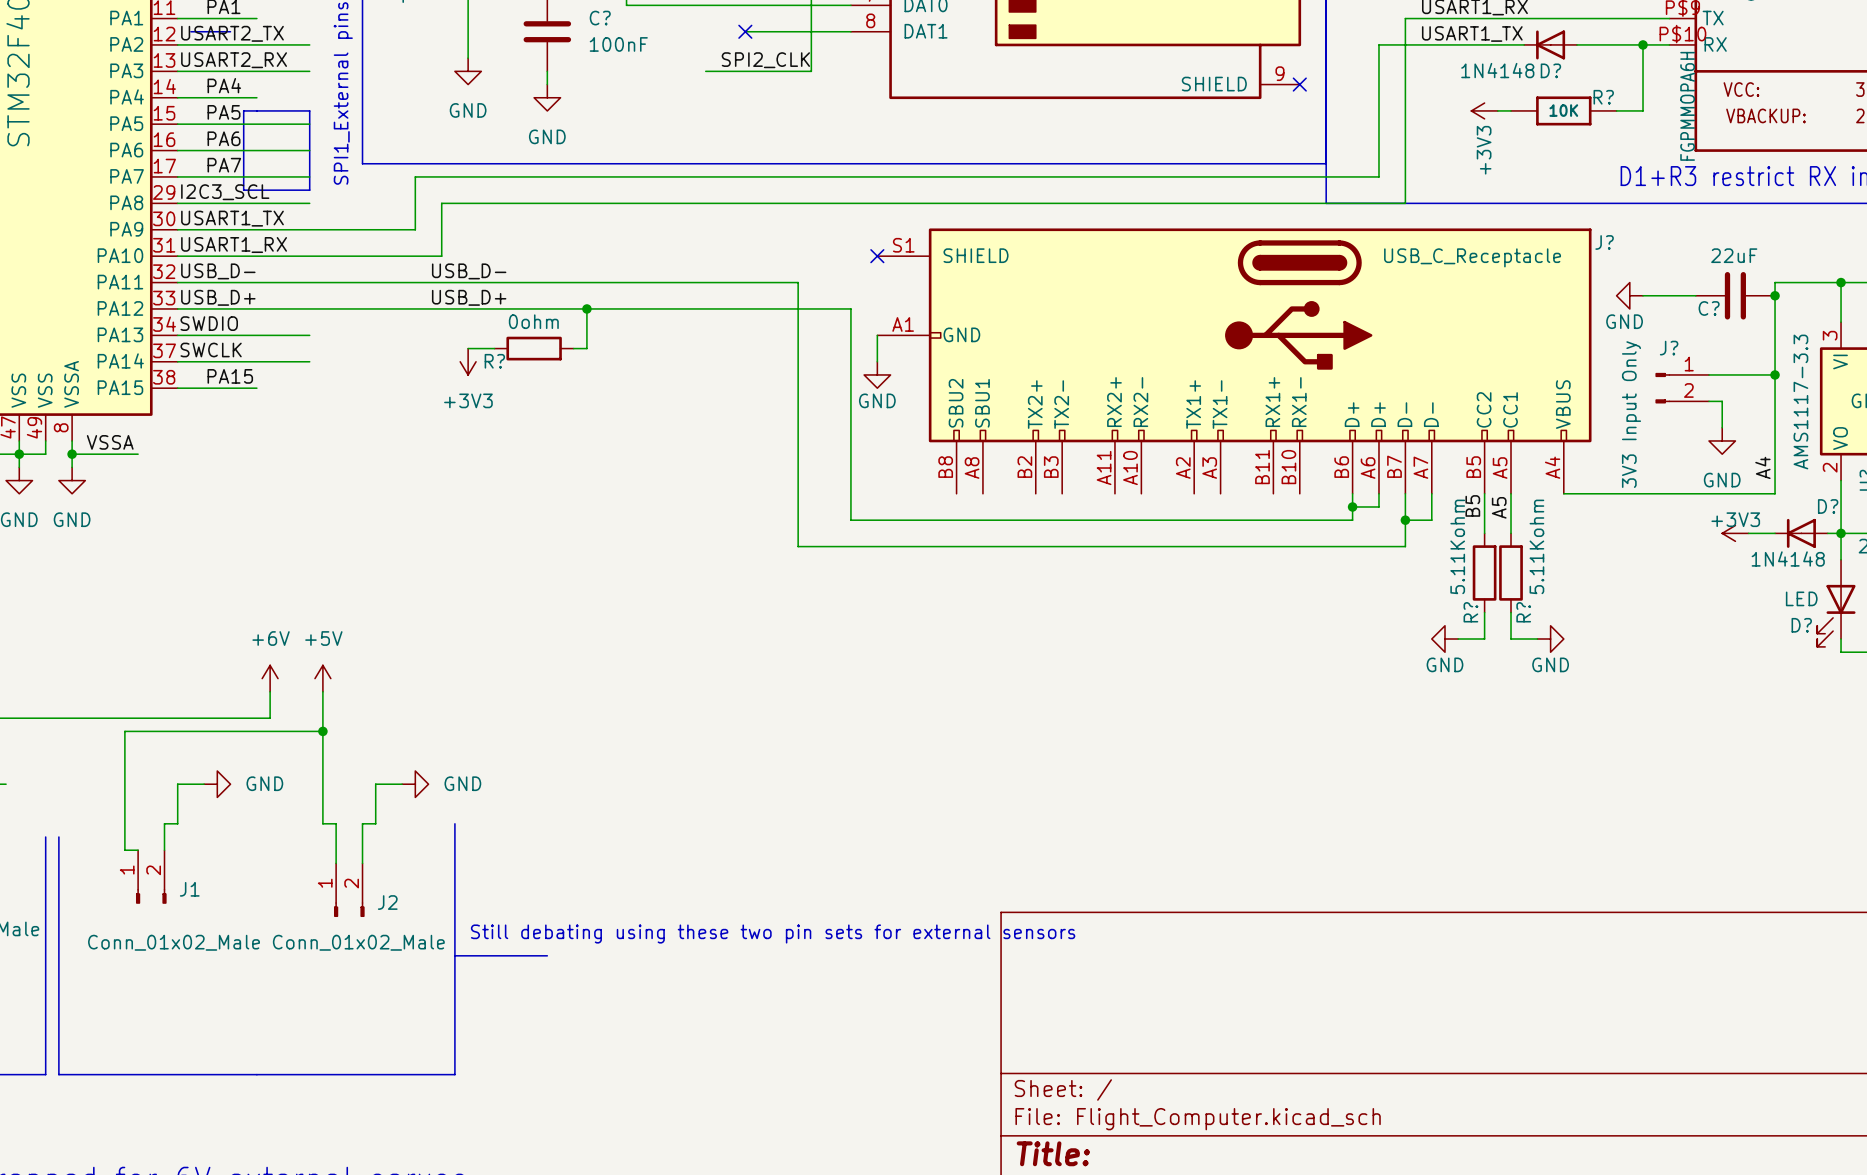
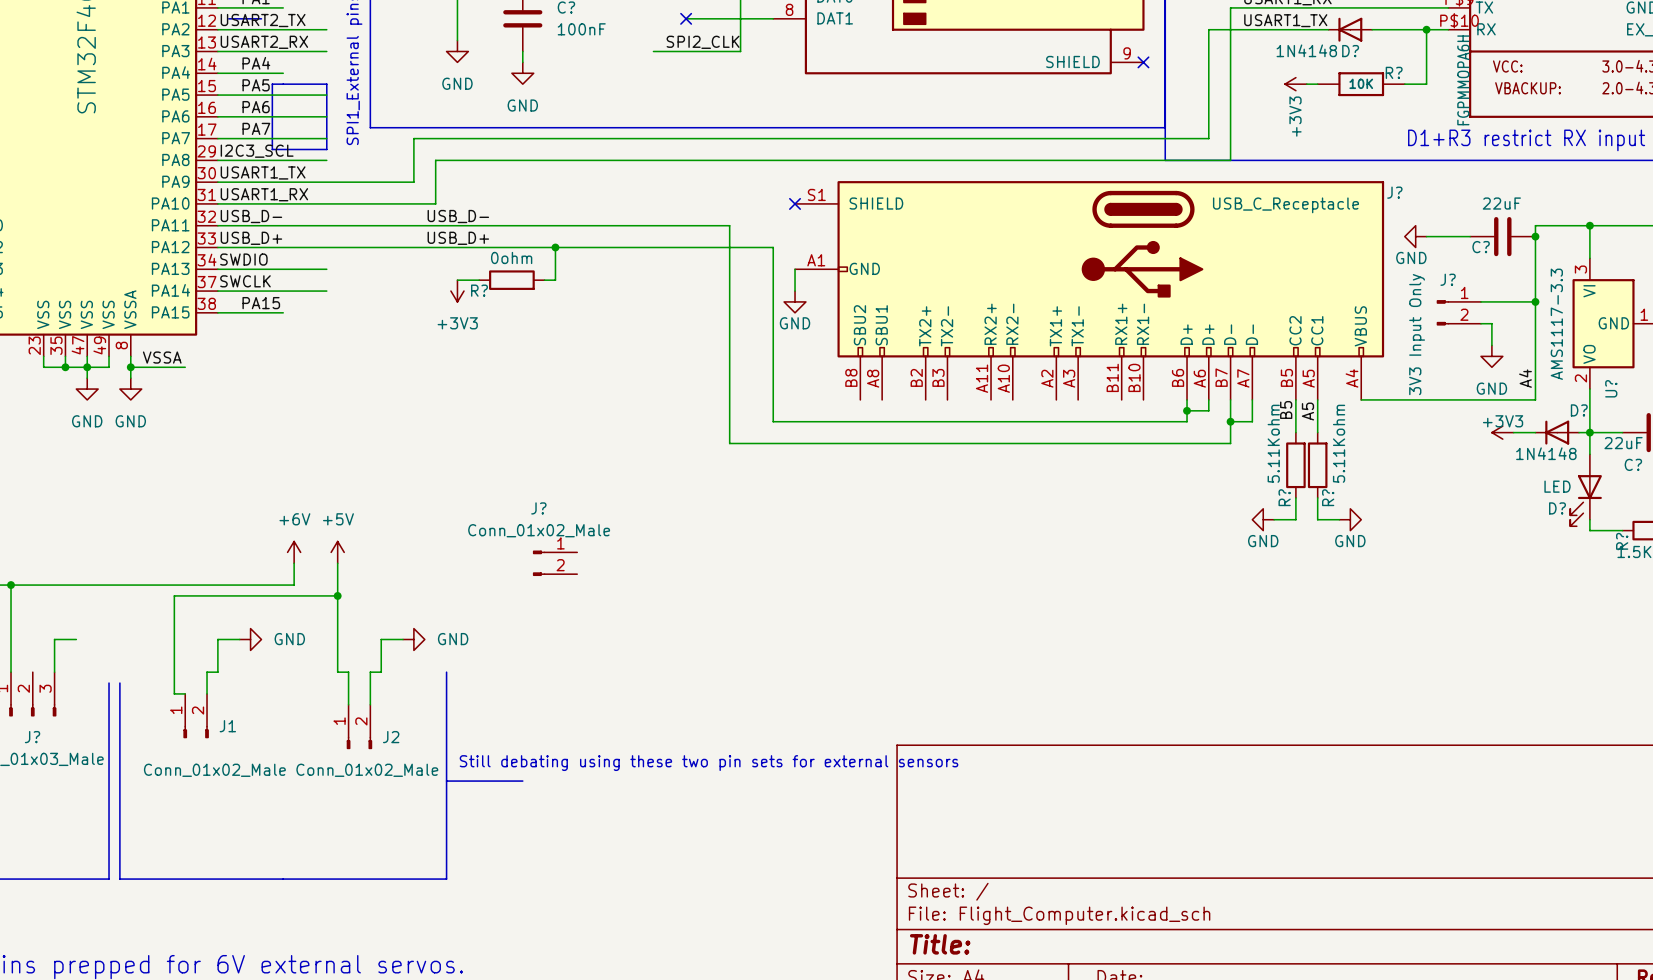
J?: none -> Conn_01x02_Male (555, 563)

